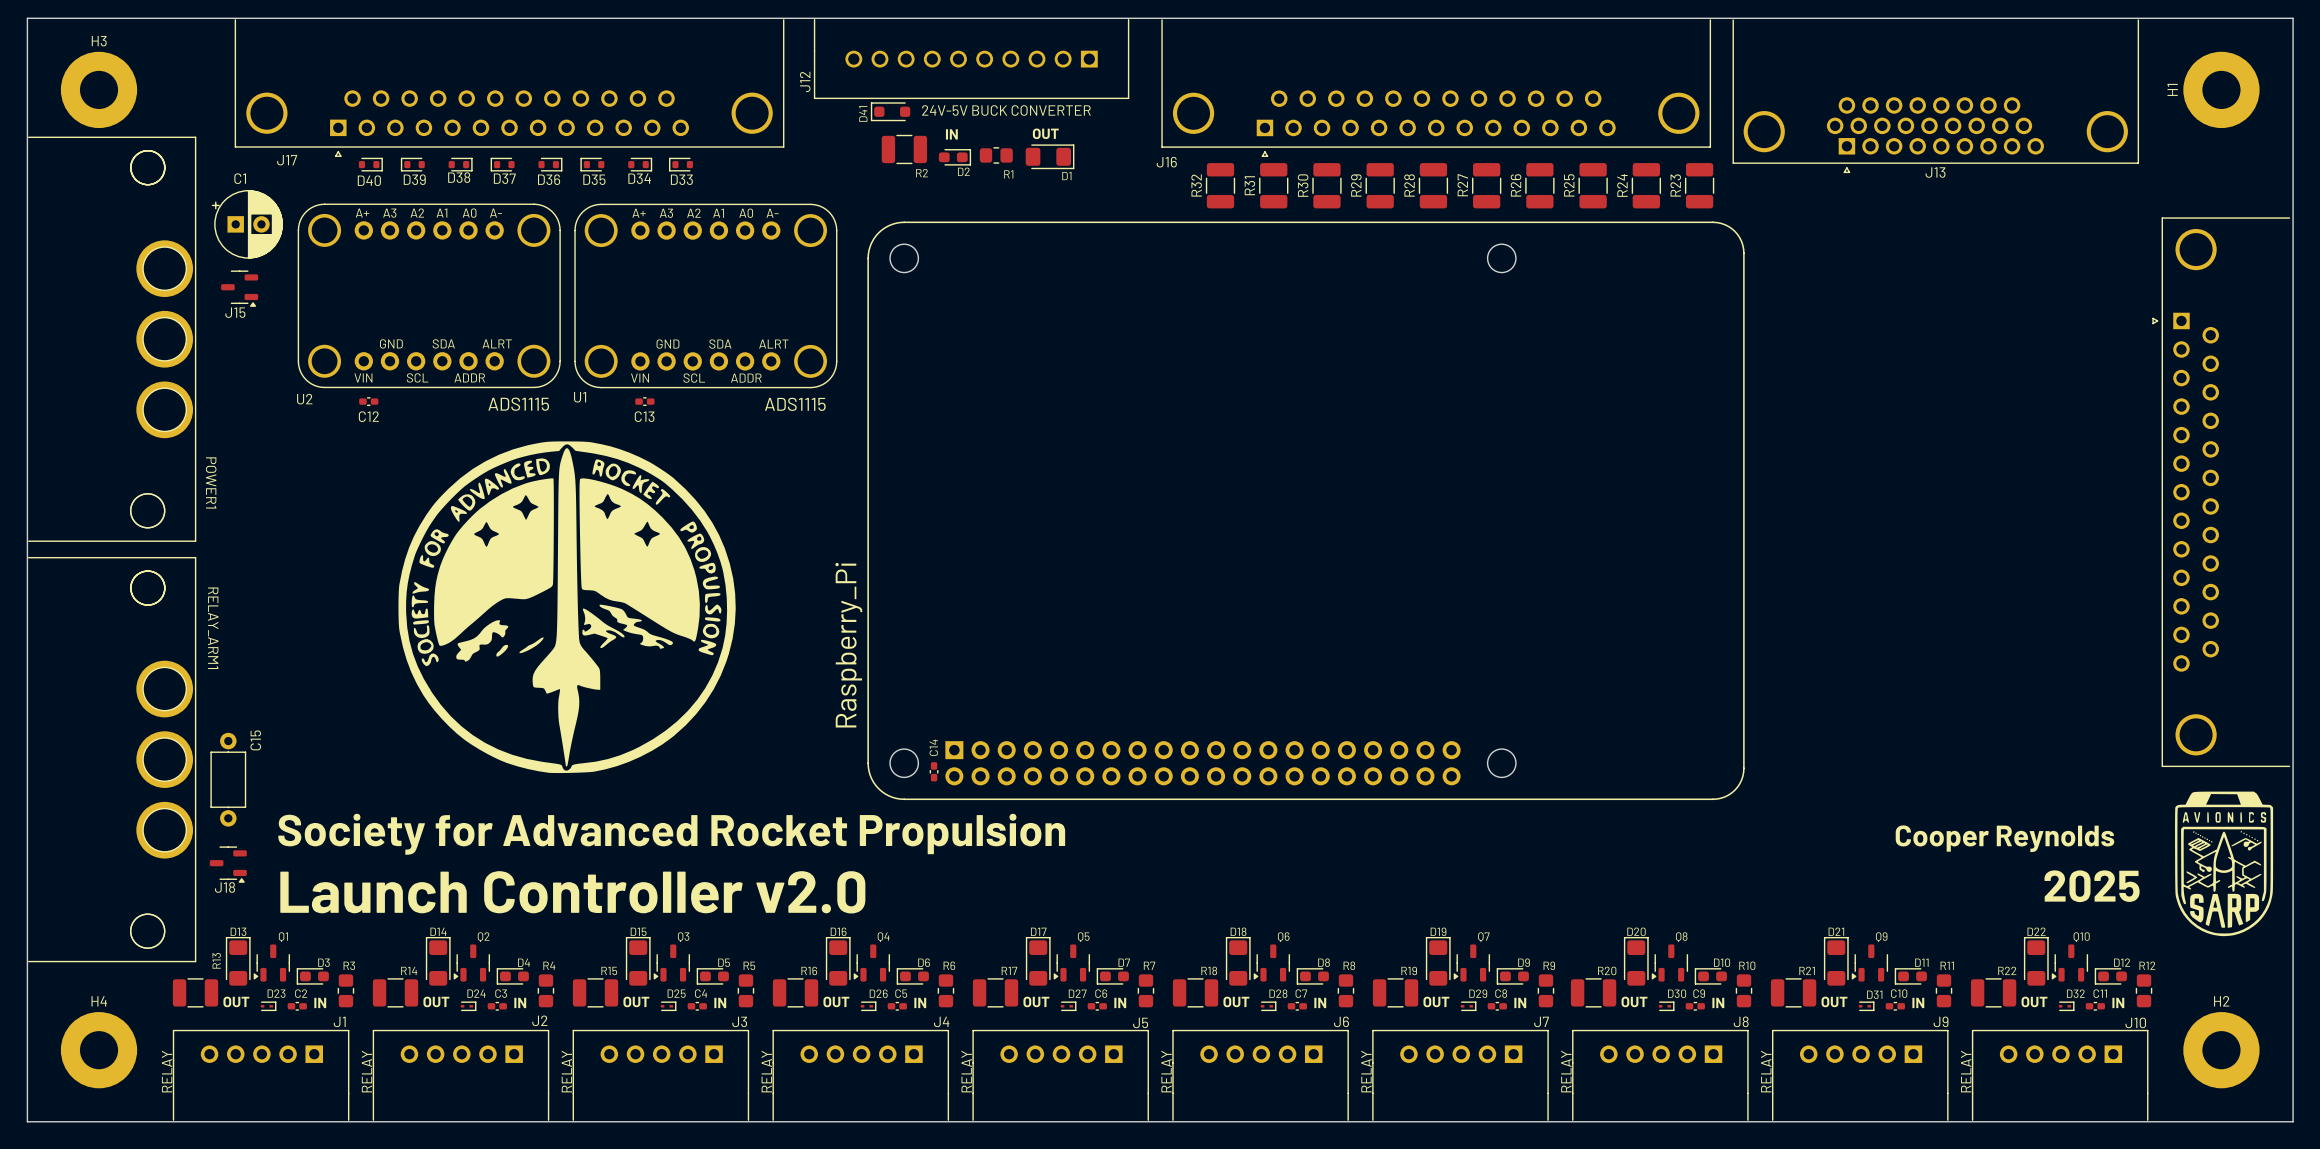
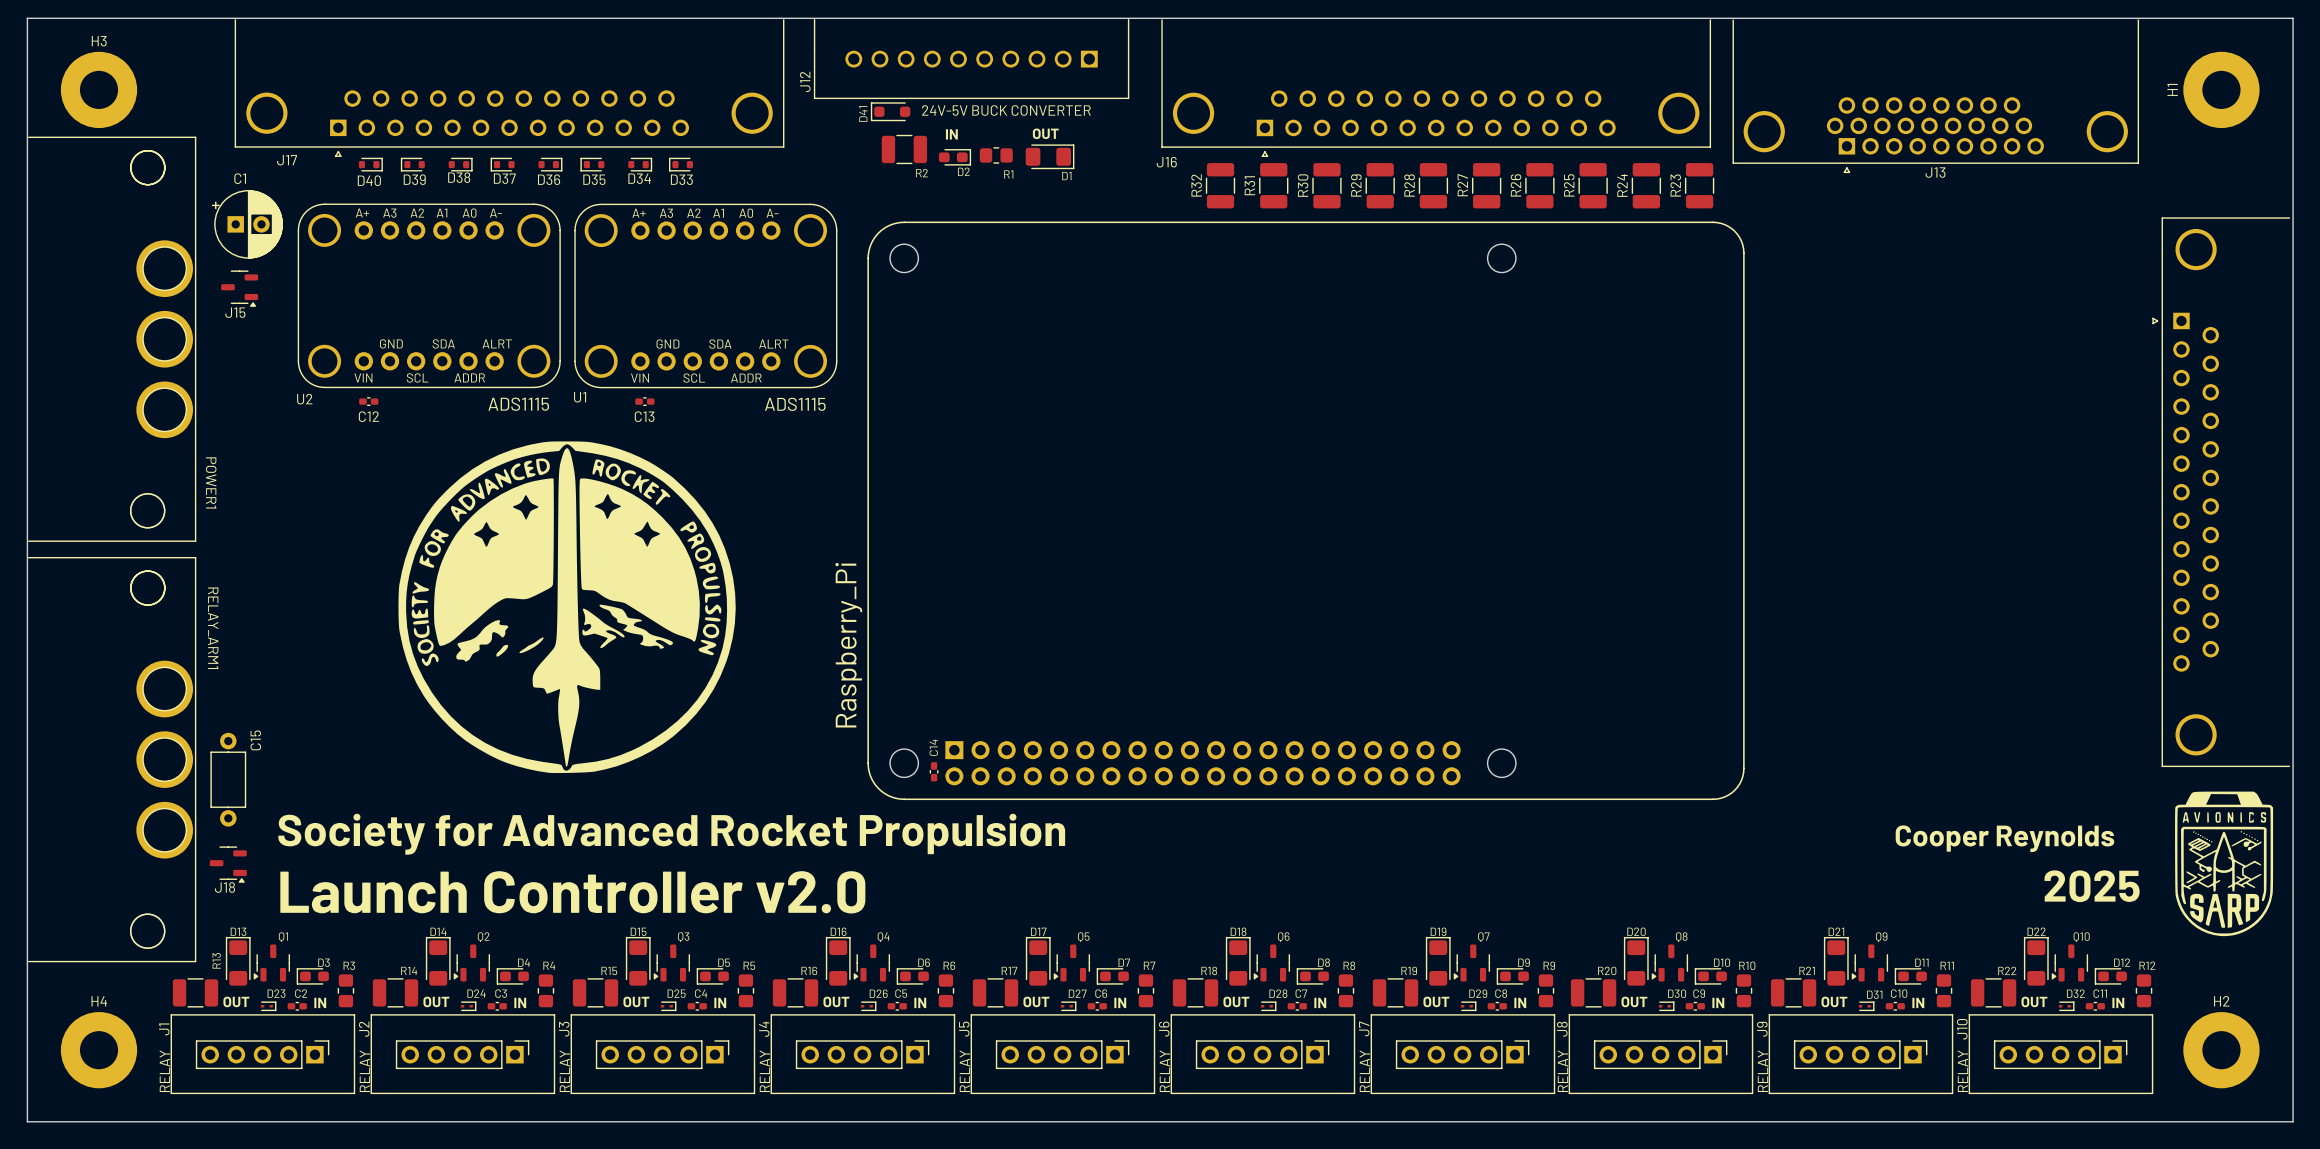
J2 name position: J2 (539, 1020) -> J2 (364, 1029)
J1 name position: J1 (339, 1021) -> J1 (164, 1029)
J3 name position: J3 (739, 1021) -> J3 (564, 1029)
J4 name position: J4 (941, 1021) -> J4 (764, 1029)
J6 name position: J6 (1341, 1021) -> J6 (1164, 1029)
J7 name position: J7 (1541, 1021) -> J7 (1364, 1028)
J8 name position: J8 (1741, 1021) -> J8 (1562, 1029)
J9 name position: J9 (1941, 1021) -> J9 (1762, 1029)
J5 name position: J5 (1140, 1022) -> J5 (964, 1029)
J10 name position: J10 (2135, 1022) -> J10 (1962, 1029)
J1 footprint: [172, 1030, 350, 1121] -> [170, 1014, 356, 1094]
J2 footprint: [372, 1030, 550, 1121] -> [370, 1014, 556, 1094]
J3 footprint: [572, 1030, 749, 1121] -> [570, 1014, 756, 1094]
J4 footprint: [772, 1030, 949, 1121] -> [770, 1014, 956, 1094]
J5 footprint: [972, 1030, 1149, 1121] -> [970, 1014, 1156, 1094]
J6 footprint: [1172, 1030, 1349, 1121] -> [1170, 1014, 1356, 1094]
J7 footprint: [1372, 1030, 1549, 1121] -> [1370, 1014, 1556, 1094]
J8 footprint: [1572, 1030, 1749, 1121] -> [1568, 1014, 1754, 1094]
J9 footprint: [1772, 1030, 1949, 1121] -> [1768, 1014, 1954, 1094]
J10 footprint: [1972, 1030, 2149, 1121] -> [1968, 1014, 2154, 1094]

